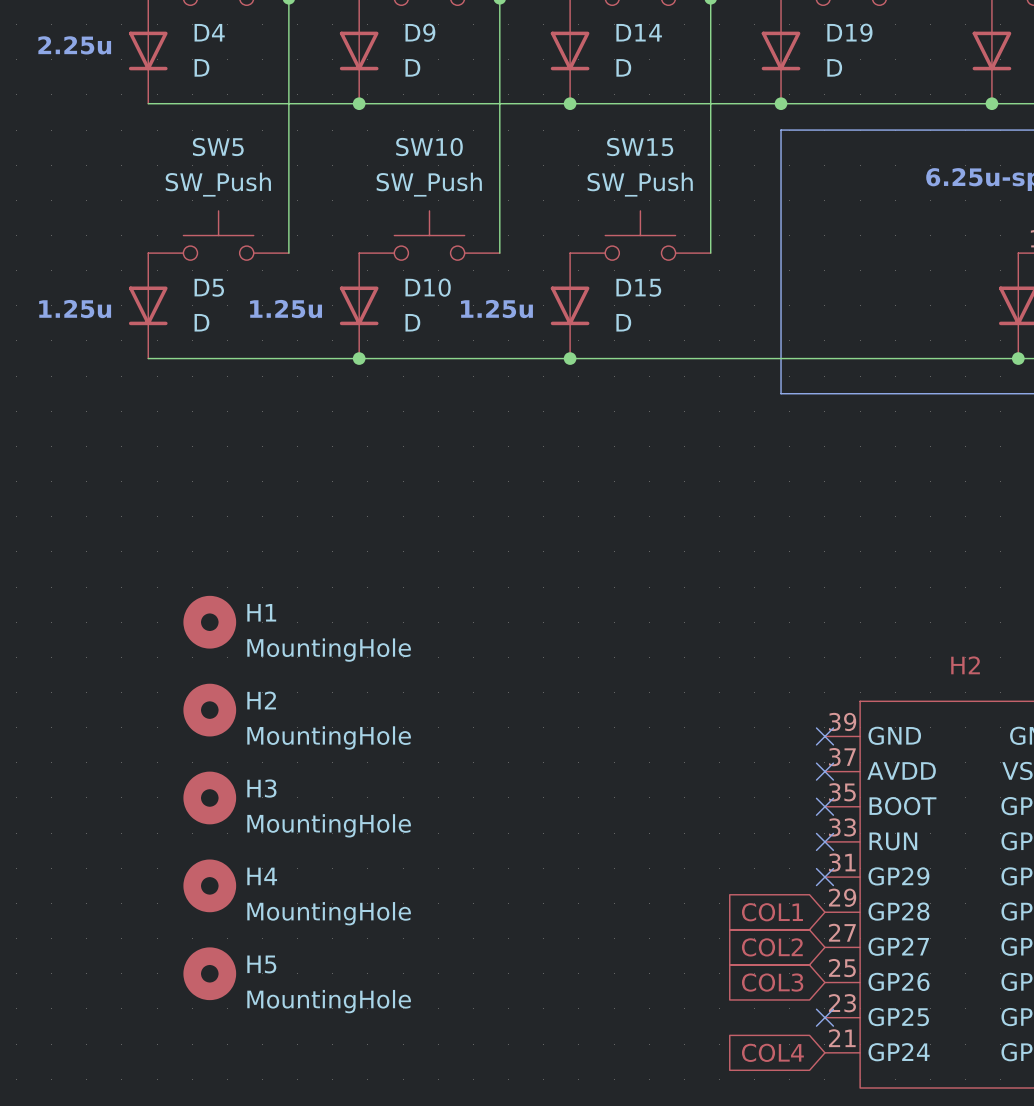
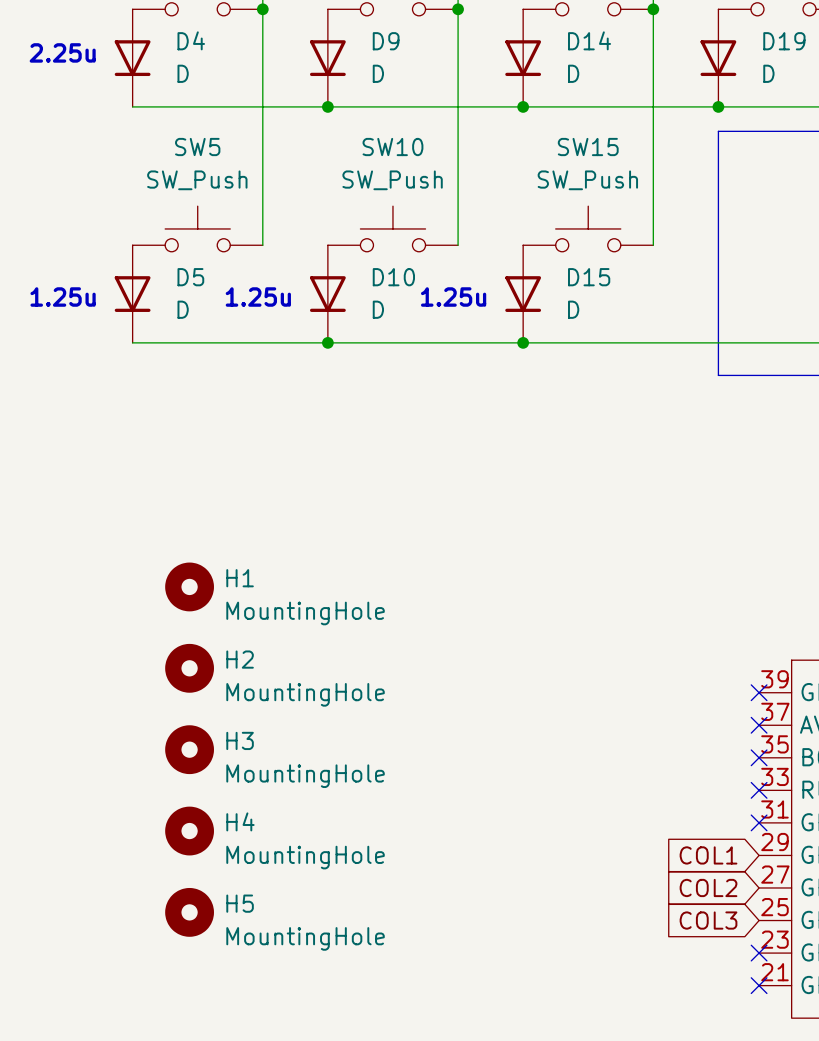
global label: COL4 (772, 1052) -> none
no-connect mark: none -> (759, 985)

